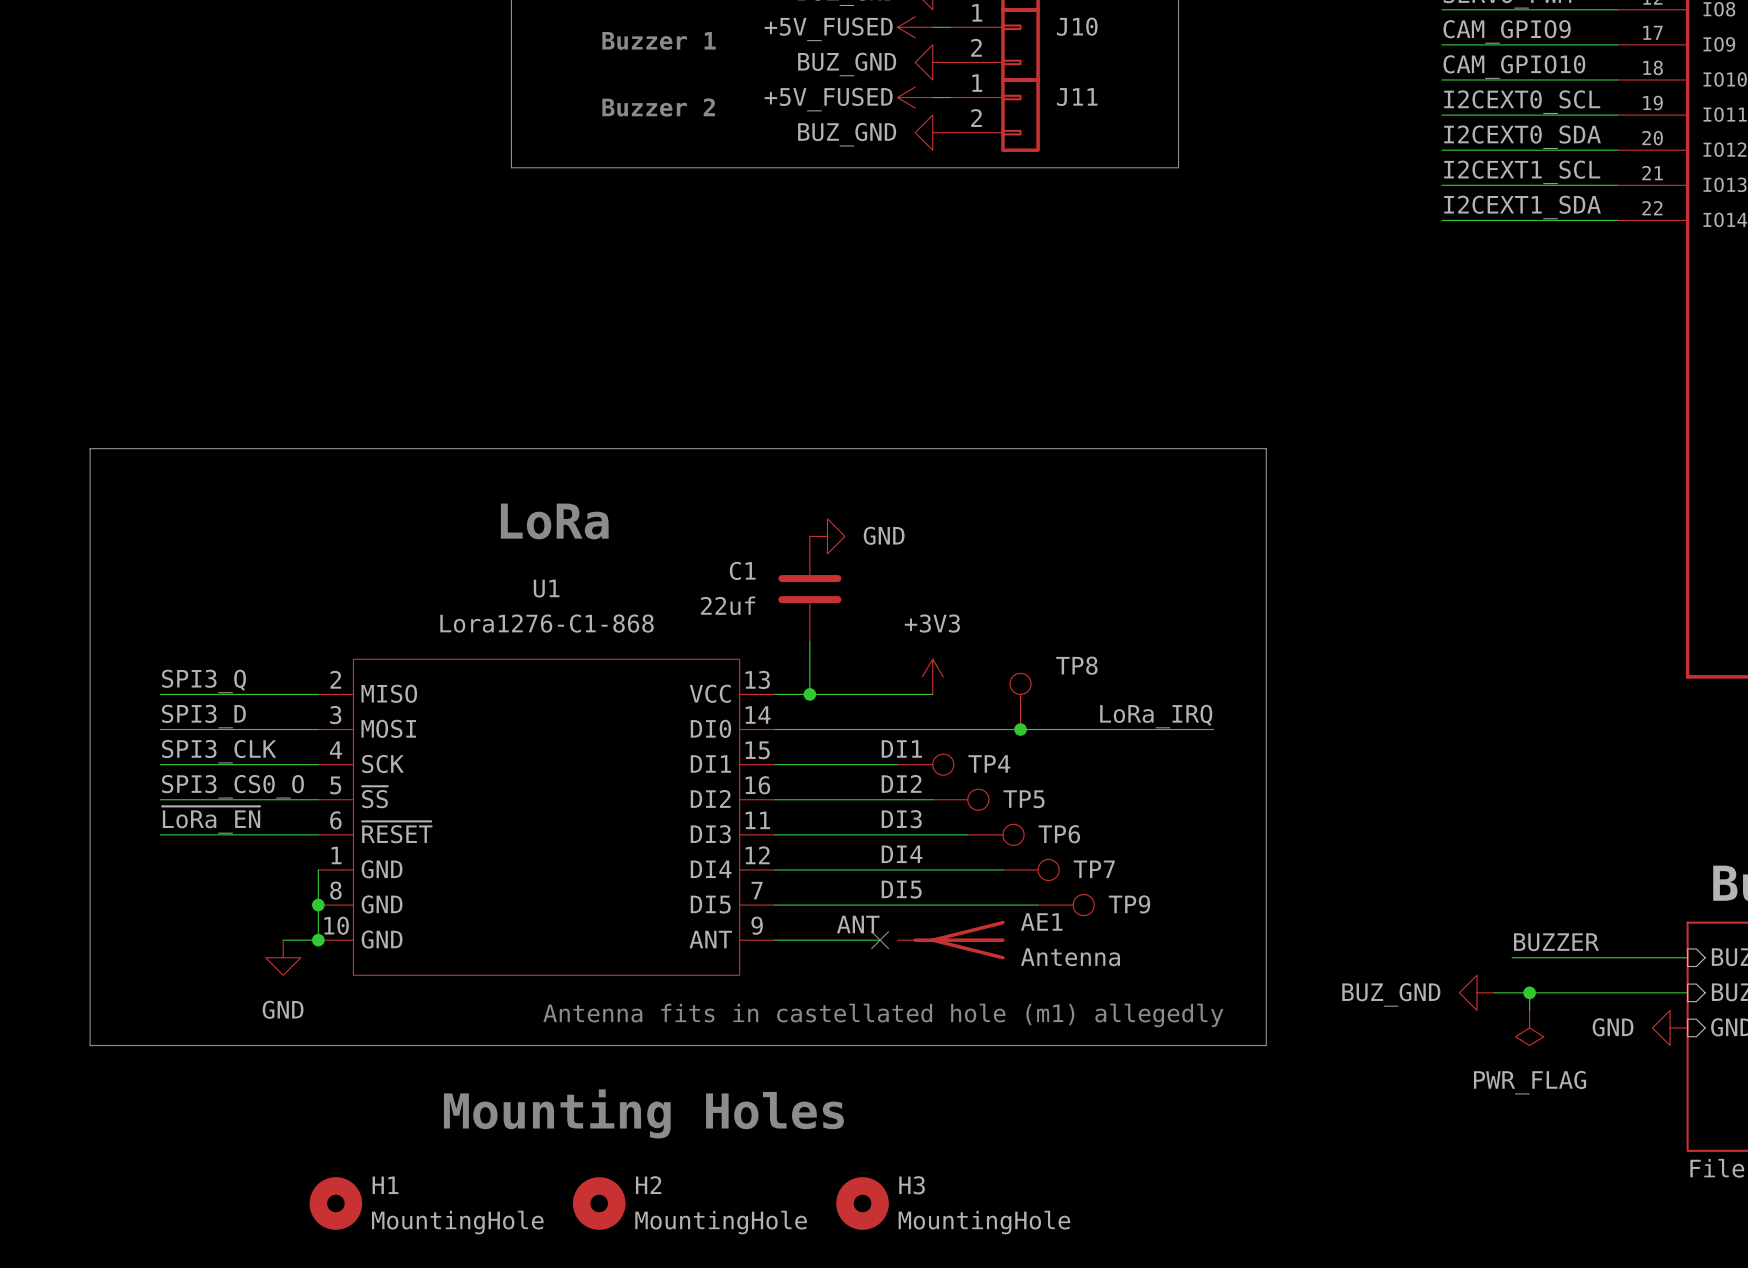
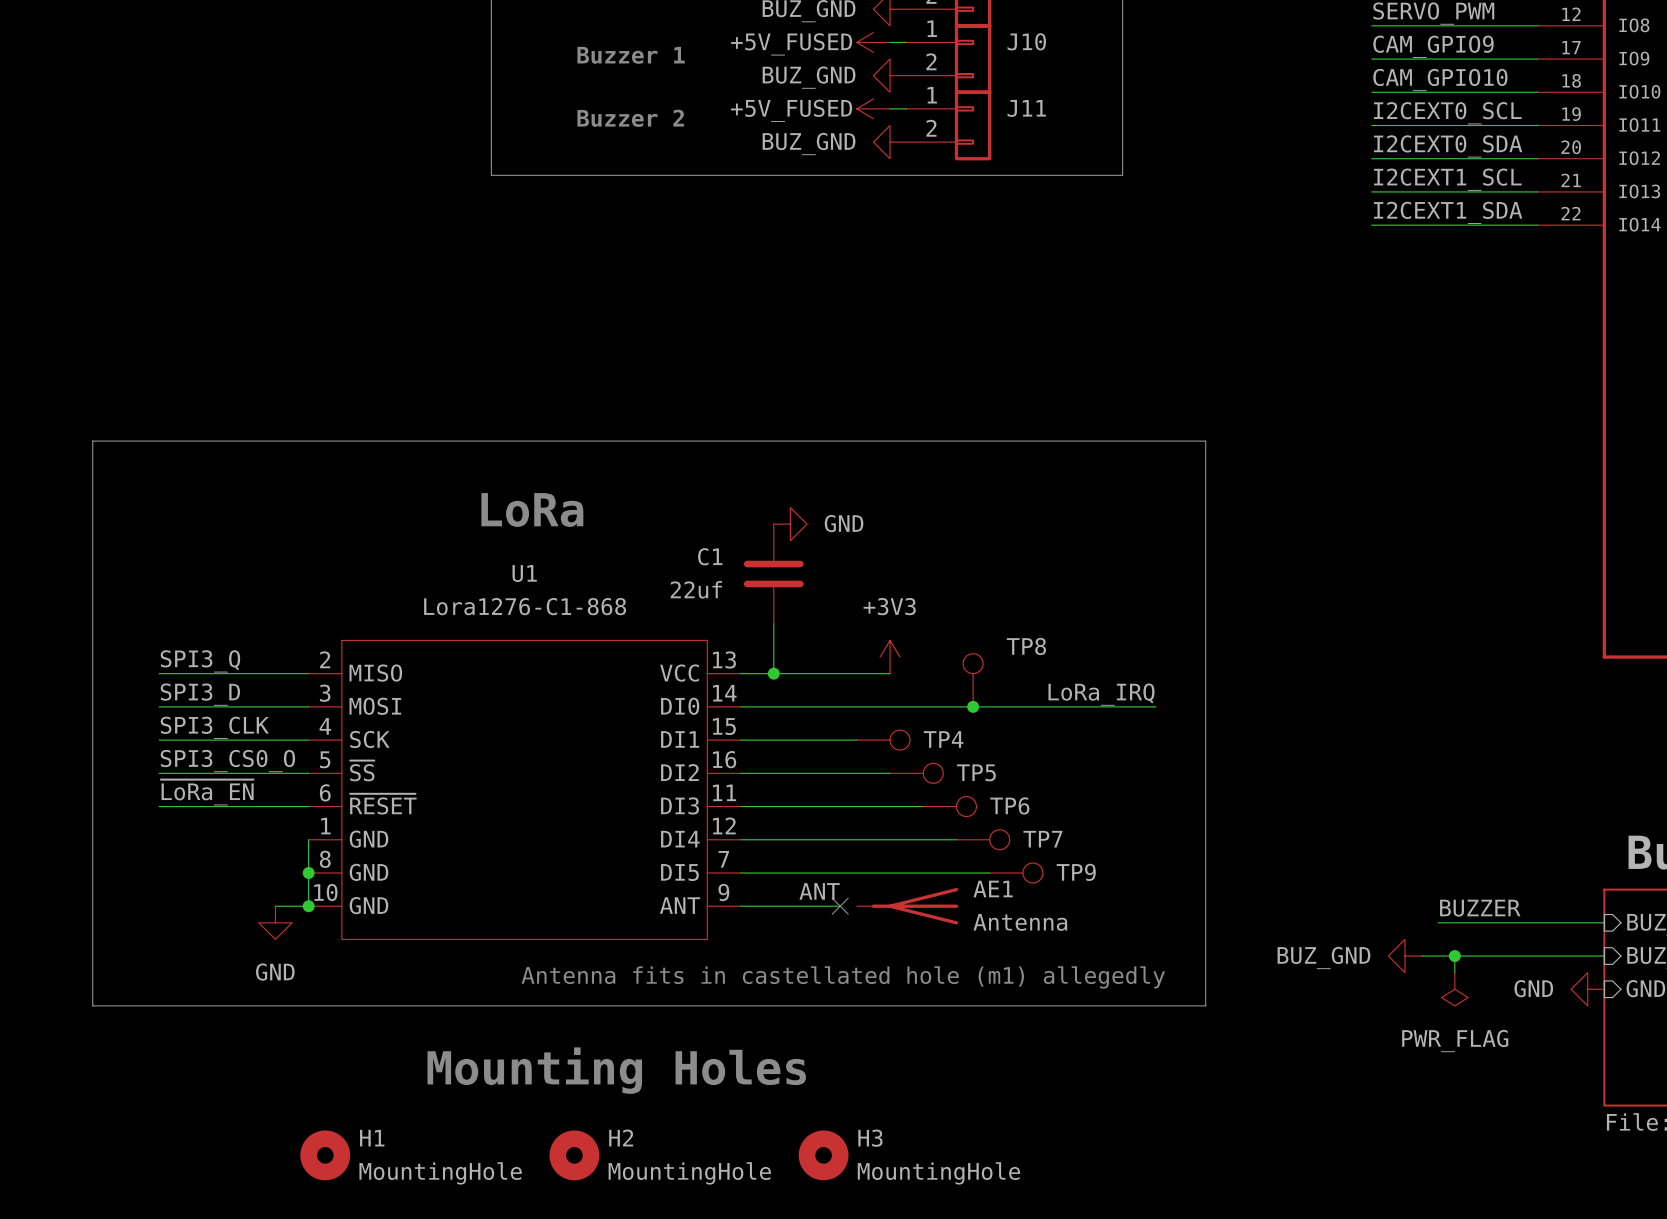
label: DI1 (901, 748) -> none
label: DI2 (901, 783) -> none
label: DI3 (901, 819) -> none
label: DI4 (902, 854) -> none
label: DI5 (901, 889) -> none

